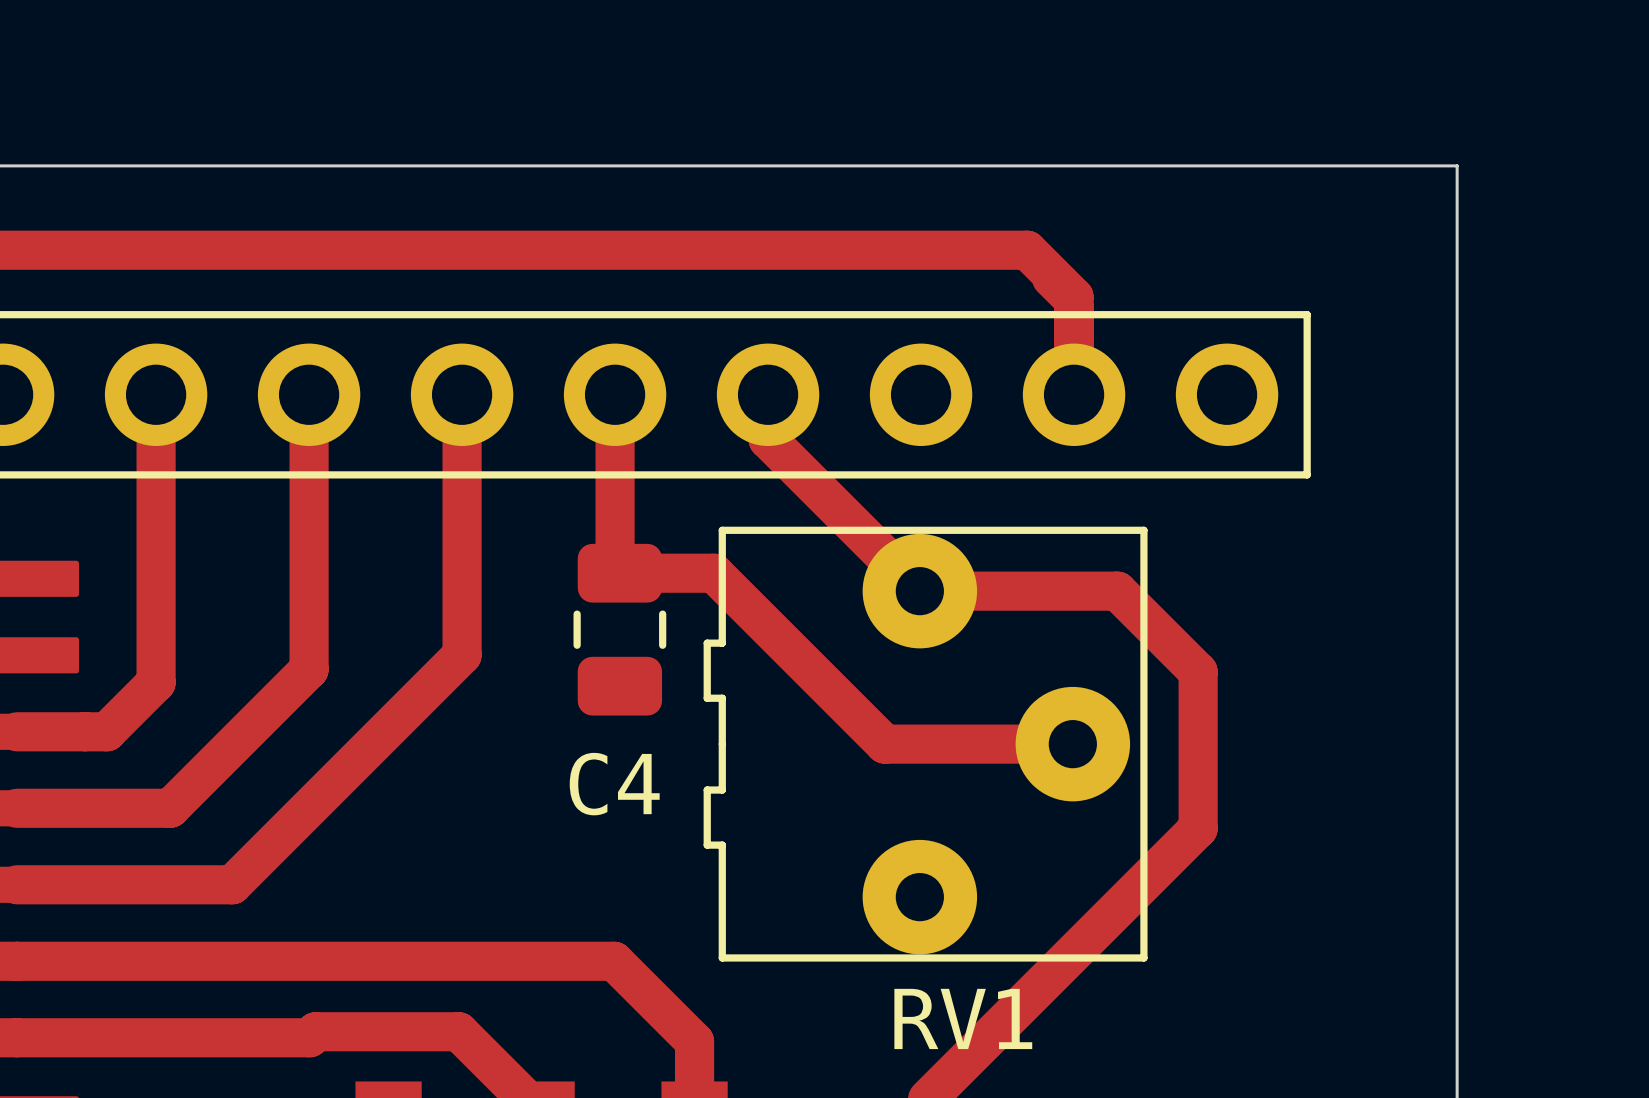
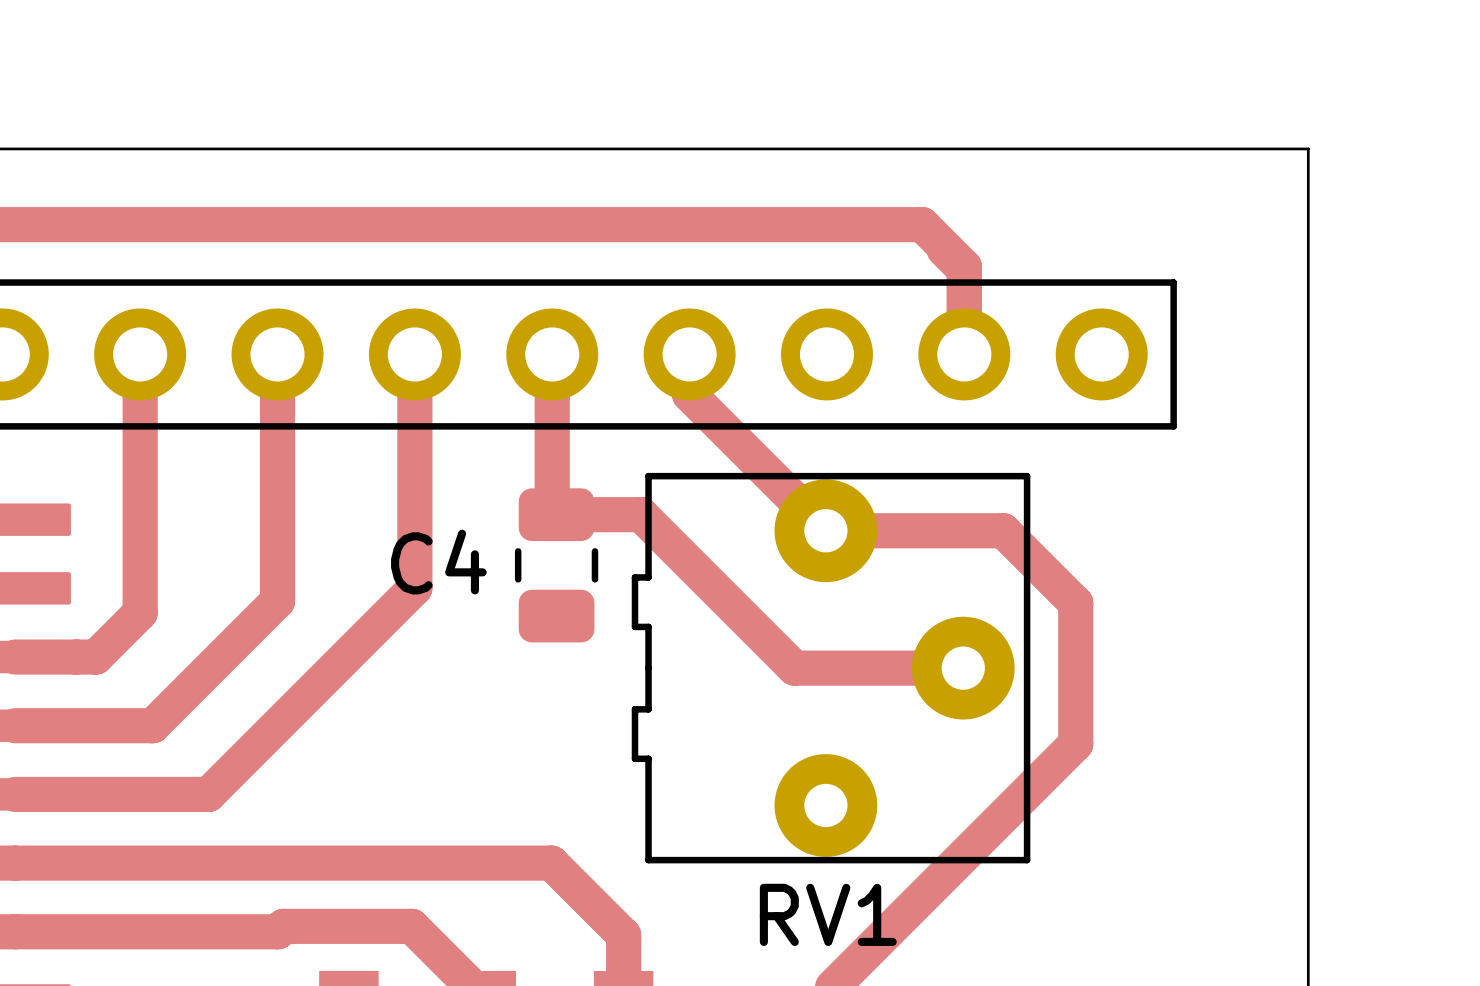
C4 name position: C4 (614, 784) -> C4 (438, 562)
RV1 name position: RV1 (963, 1018) -> RV1 (828, 914)

